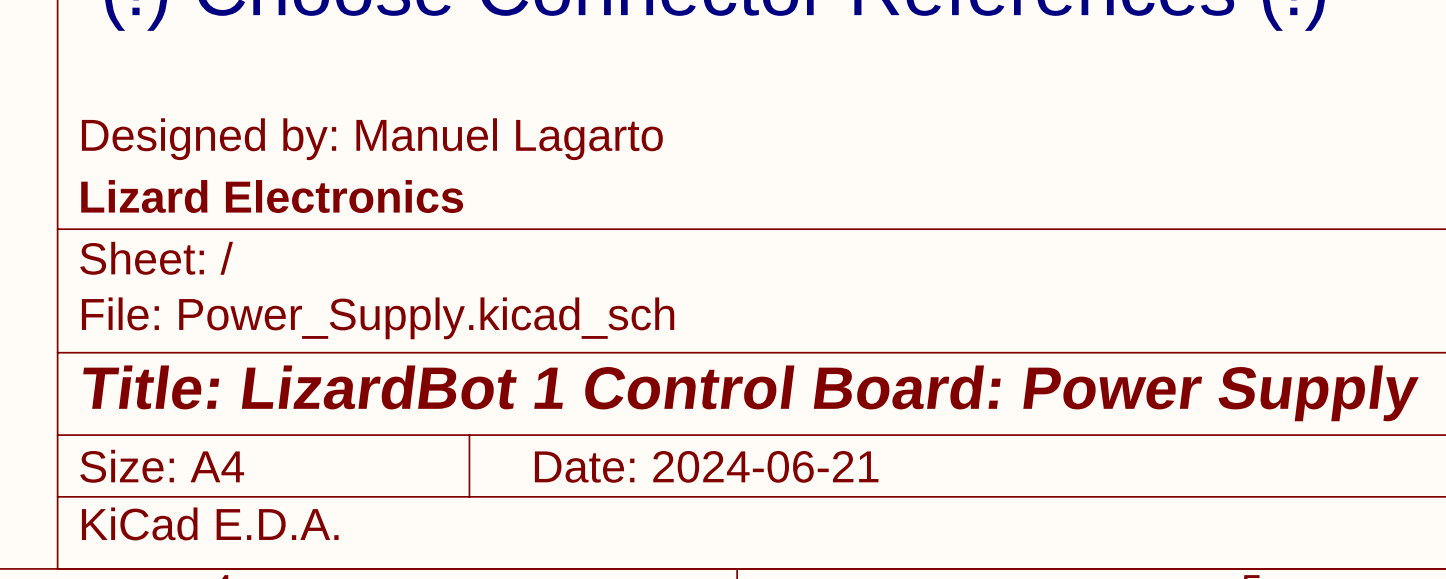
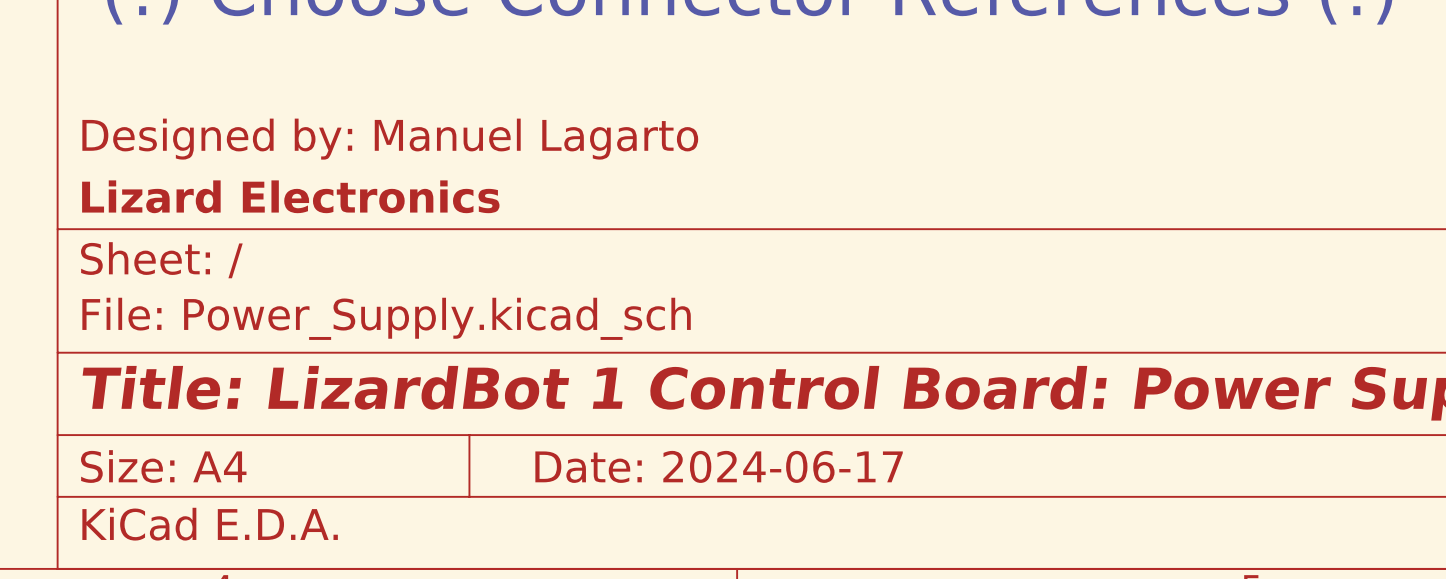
title block: Date: 2024-06-21 (706, 466) -> Date: 2024-06-17 (719, 466)

